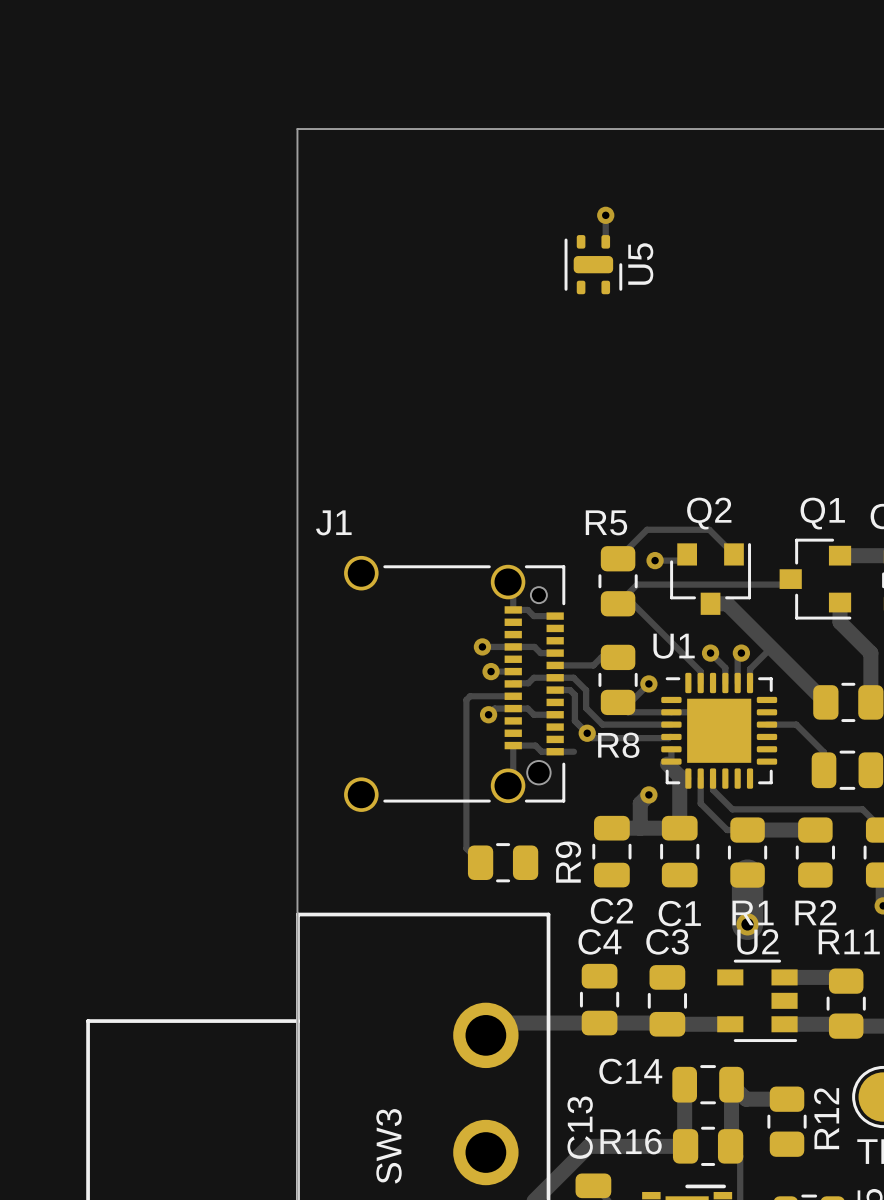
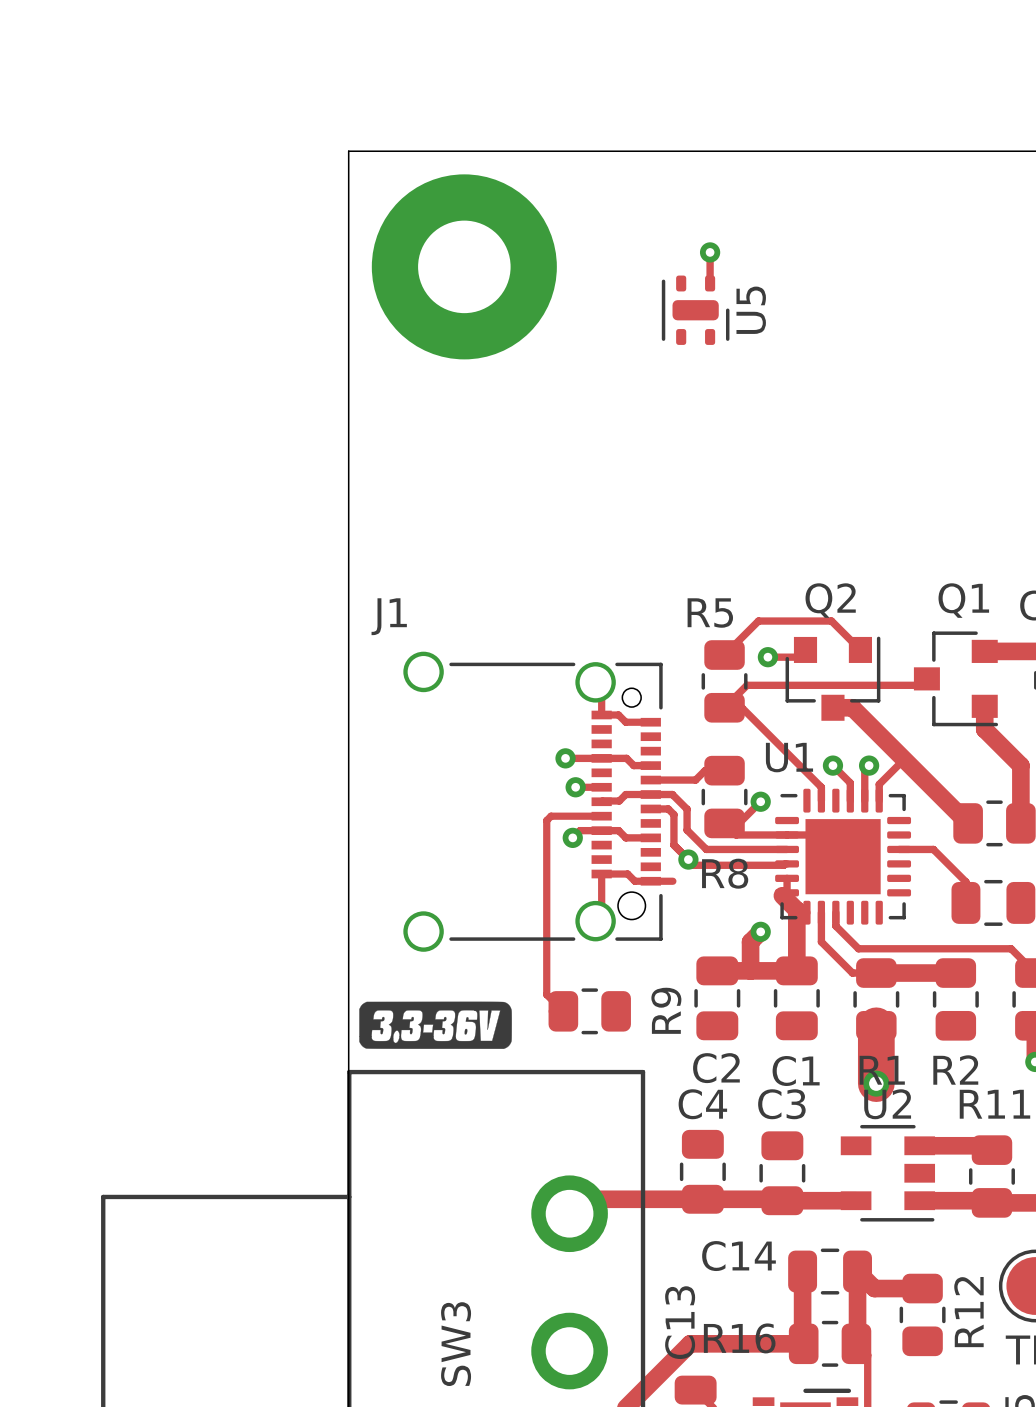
part: none -> (464, 266)
drawing: none -> [359, 1001, 512, 1049]

